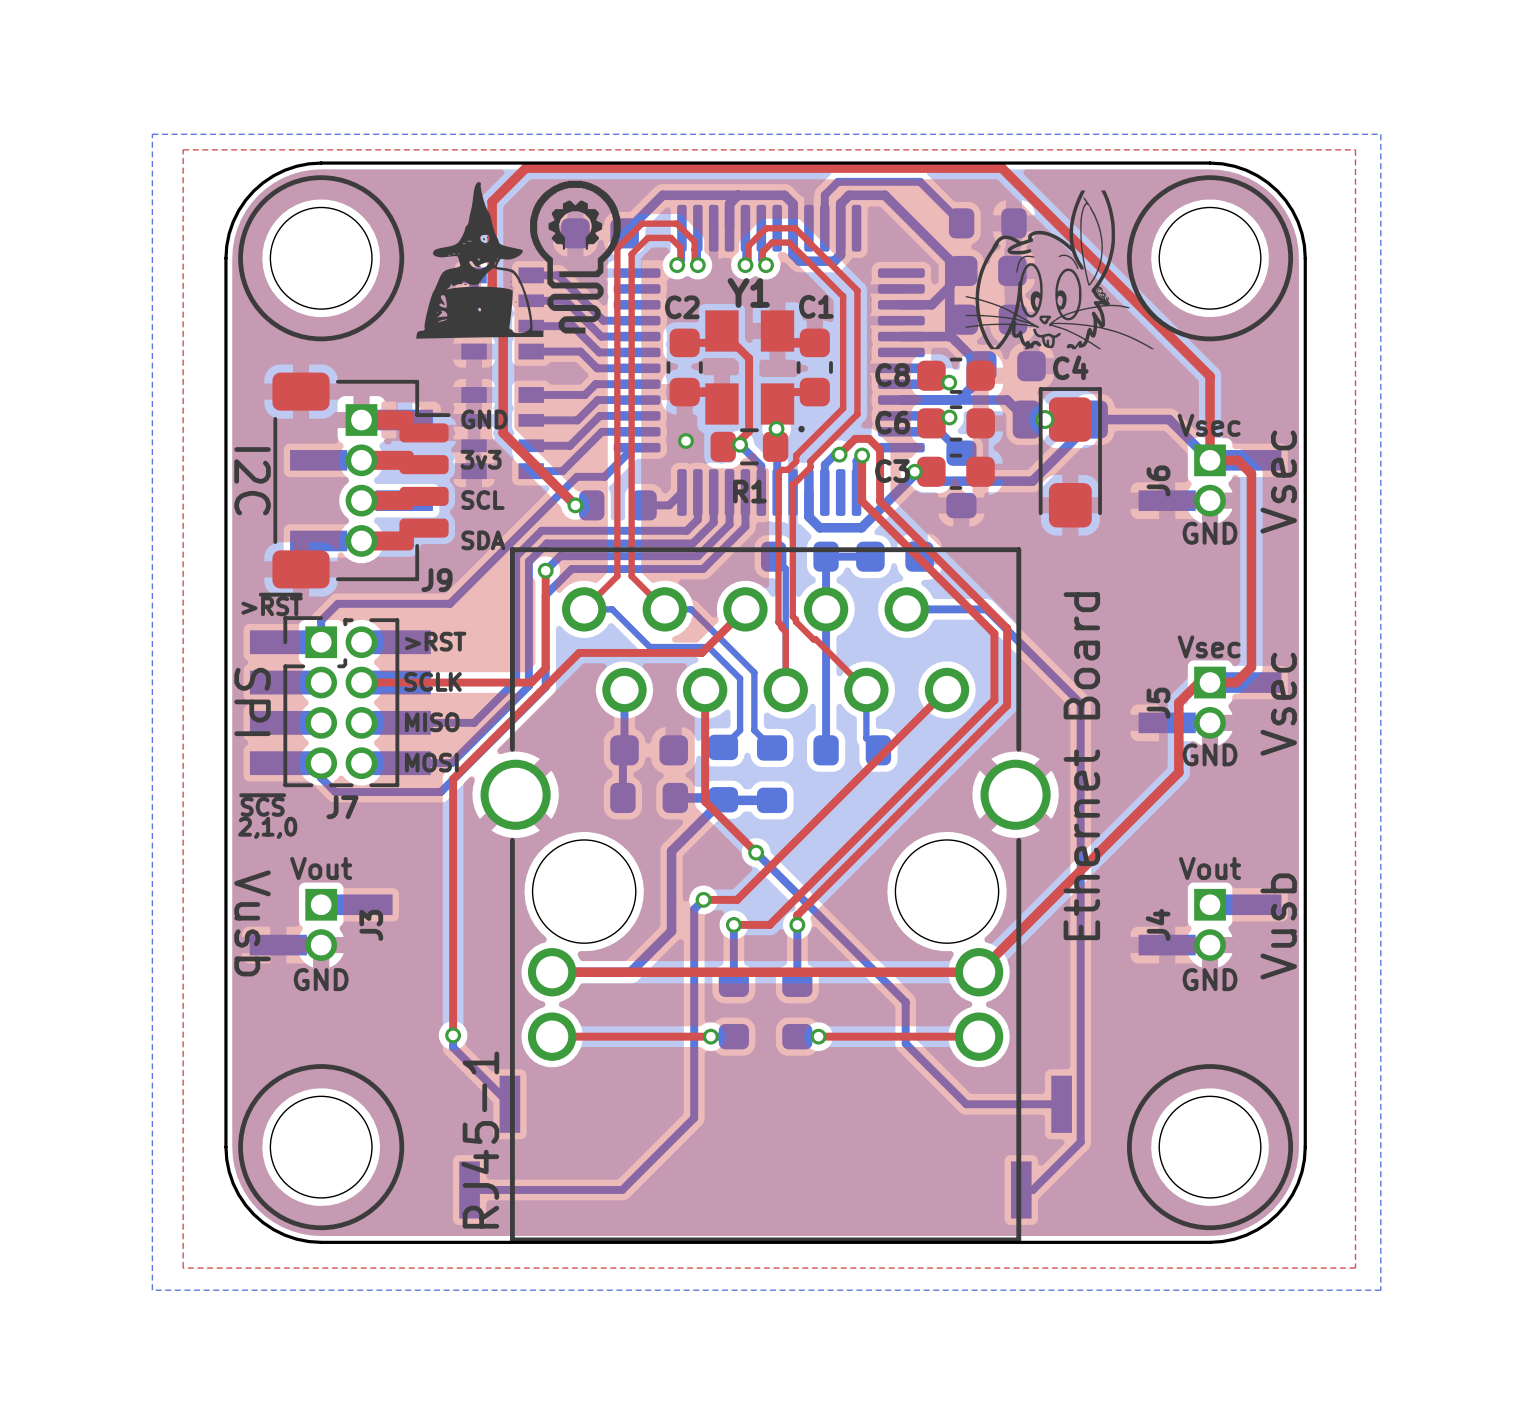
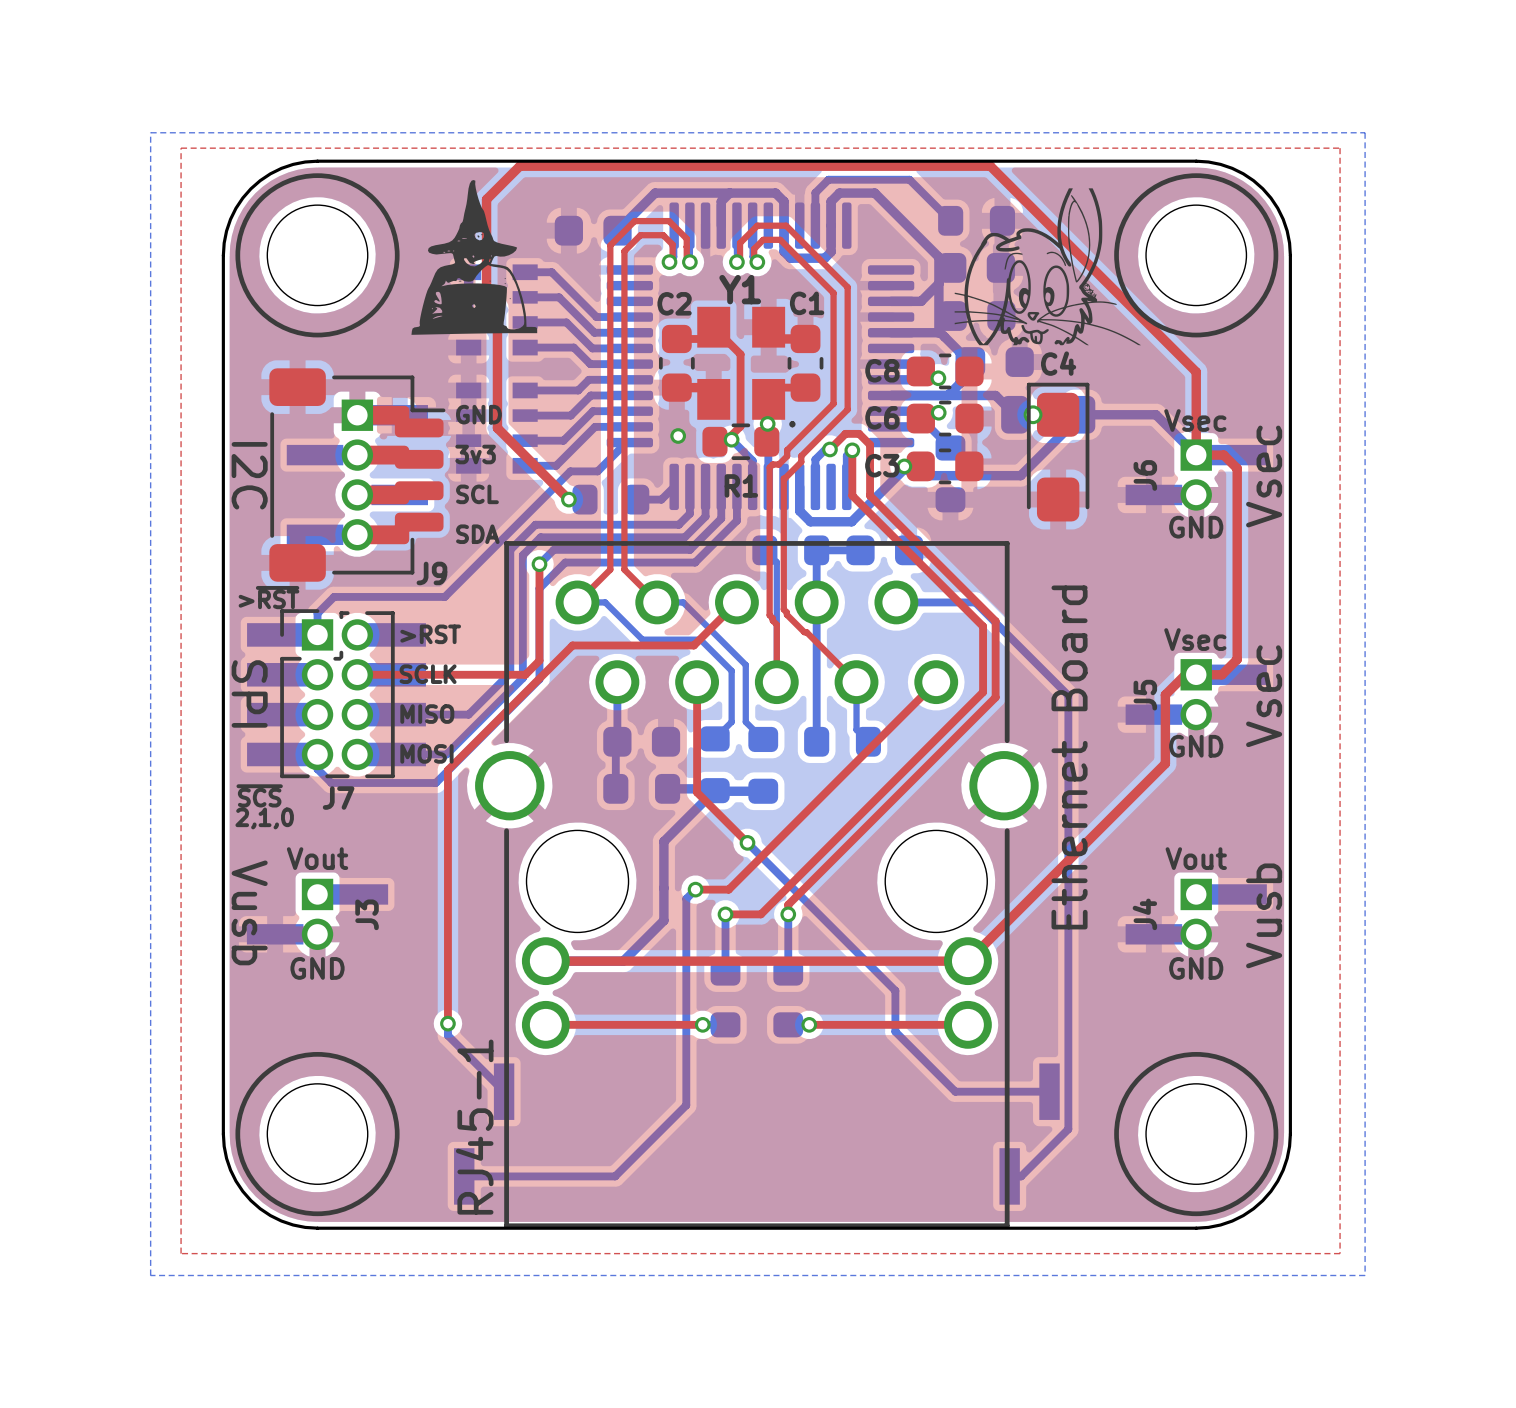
drawing: [530, 180, 621, 334] -> none

